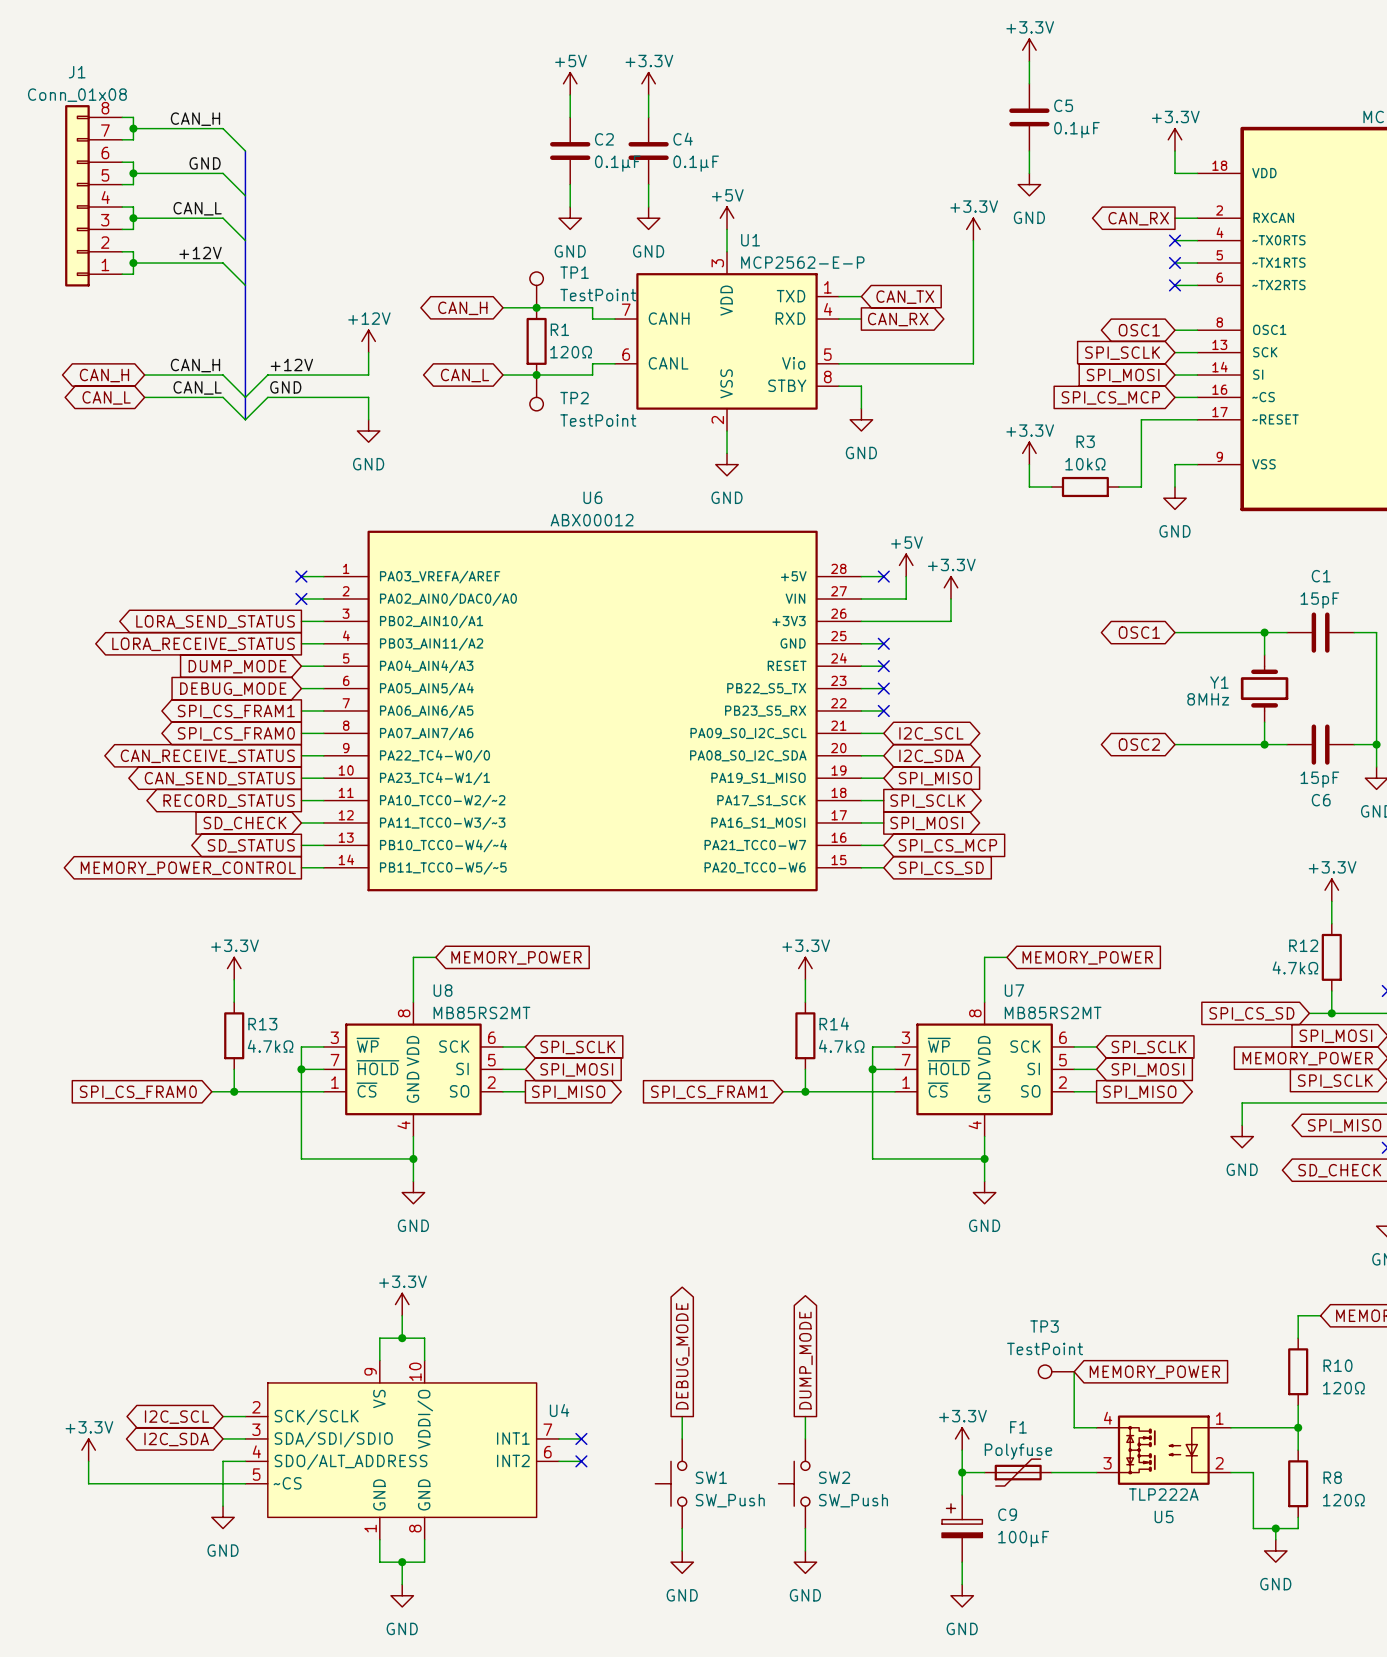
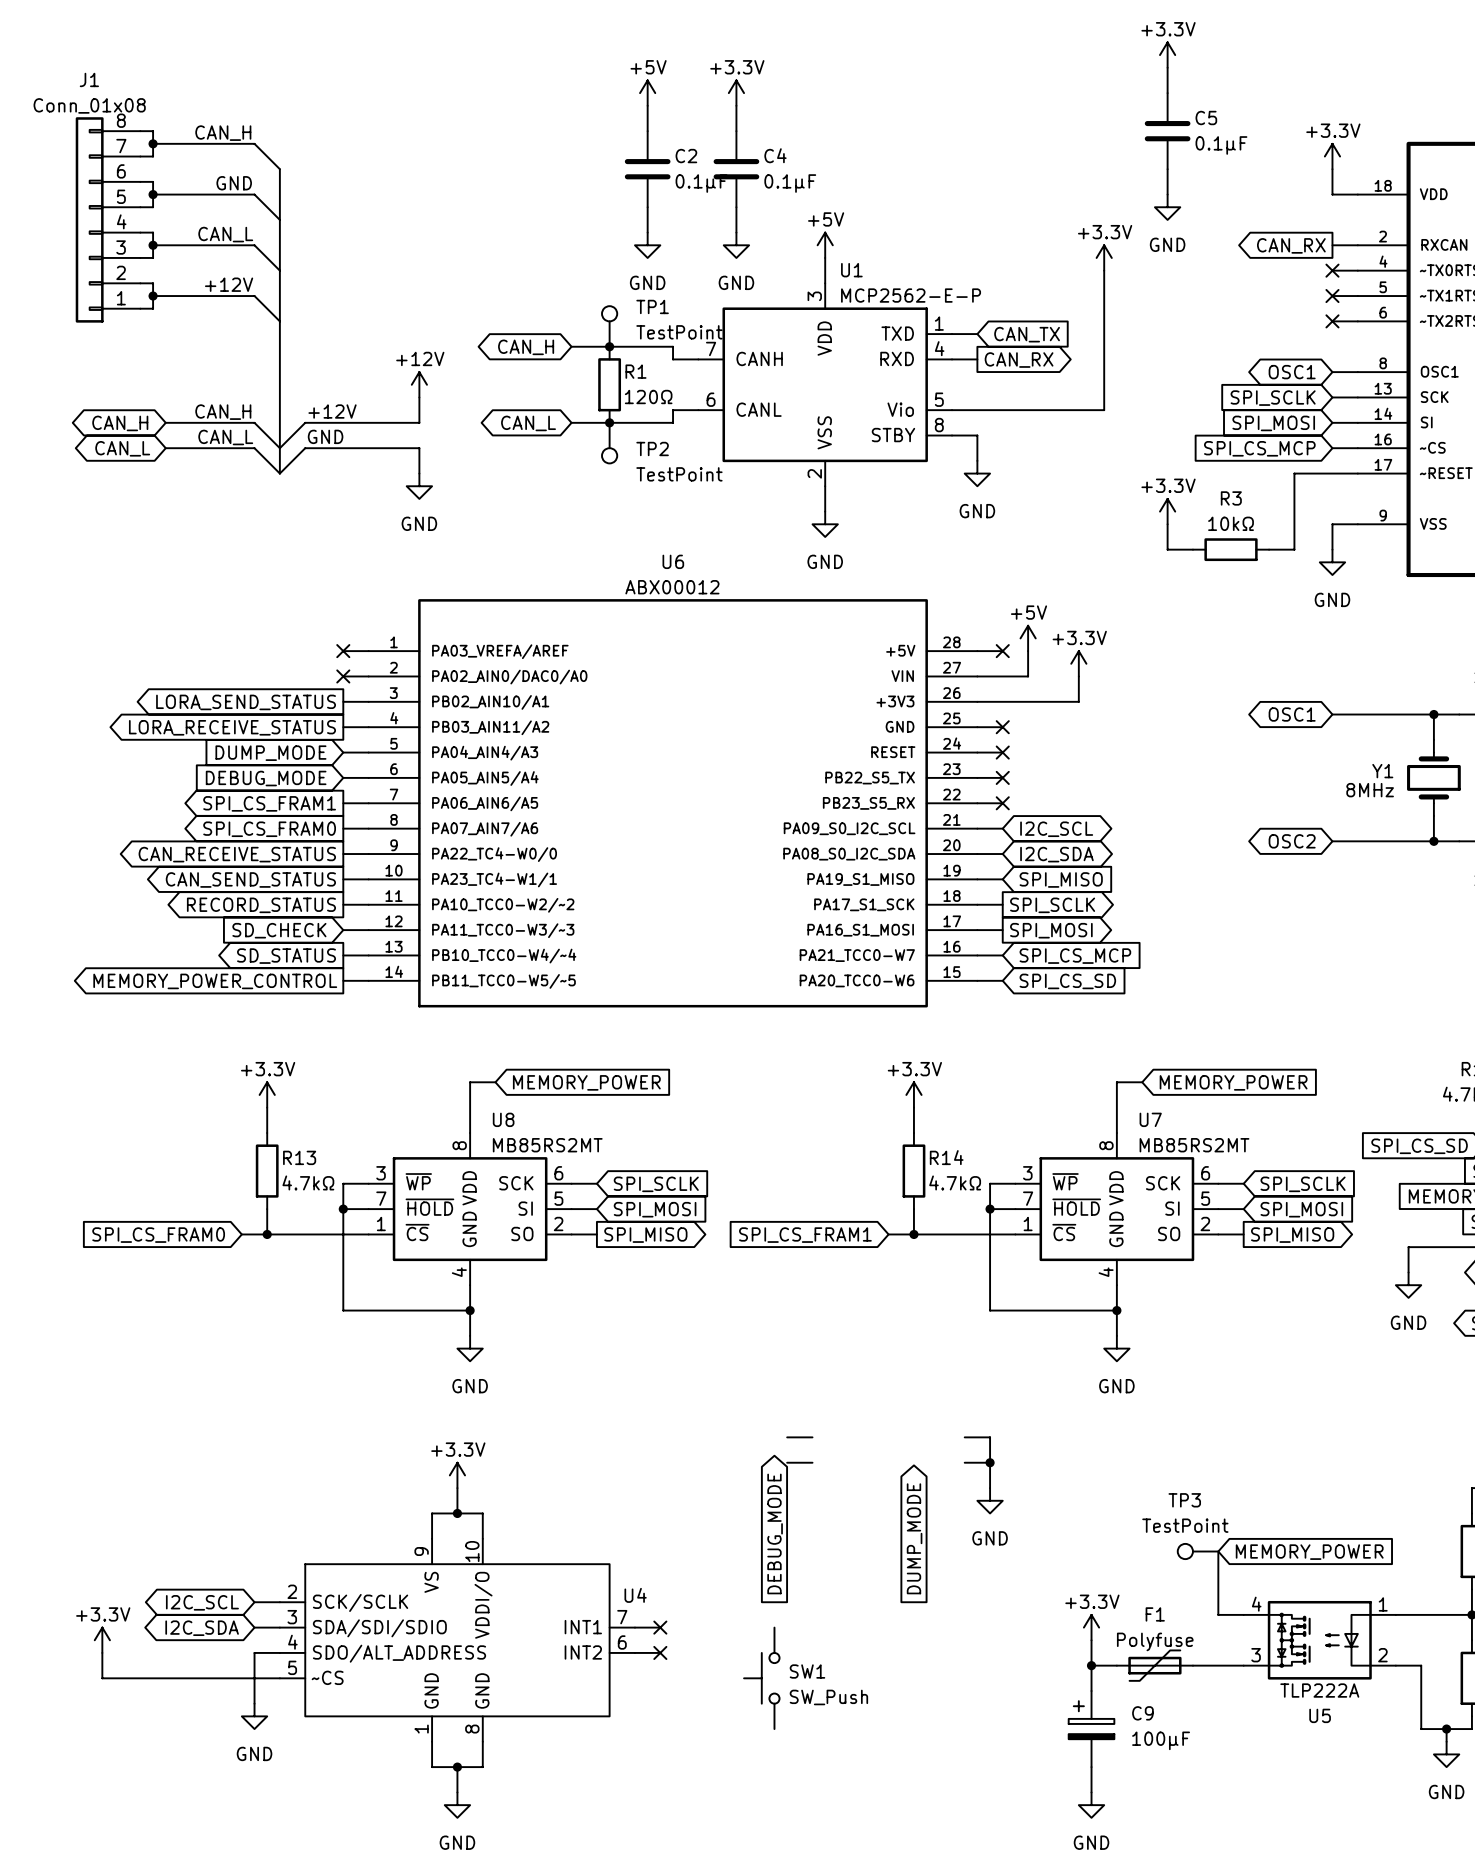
wire: none -> (787, 1437) (812, 1437)
wire: none -> (964, 1437) (990, 1437) (990, 1488)
wire: none -> (787, 1462) (812, 1462)
wire: none -> (964, 1462) (990, 1462)
junction: none -> (990, 1462)
power symbol: none -> GND (990, 1500)
wire: (682, 1416) (682, 1438) -> none
wire: (805, 1416) (805, 1438) -> none
SW2: SW_Push (794, 1483) -> none
wire: (682, 1528) (682, 1550) -> none
wire: (805, 1528) (805, 1550) -> none
power symbol: GND (682, 1562) -> none
power symbol: GND (805, 1562) -> none

